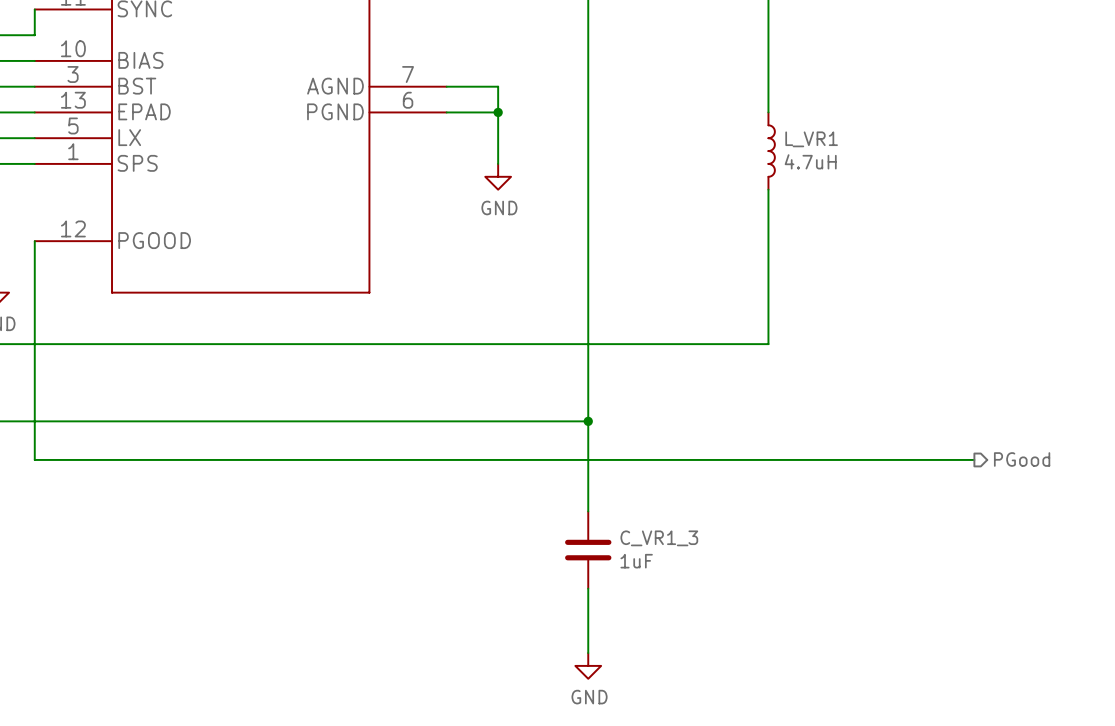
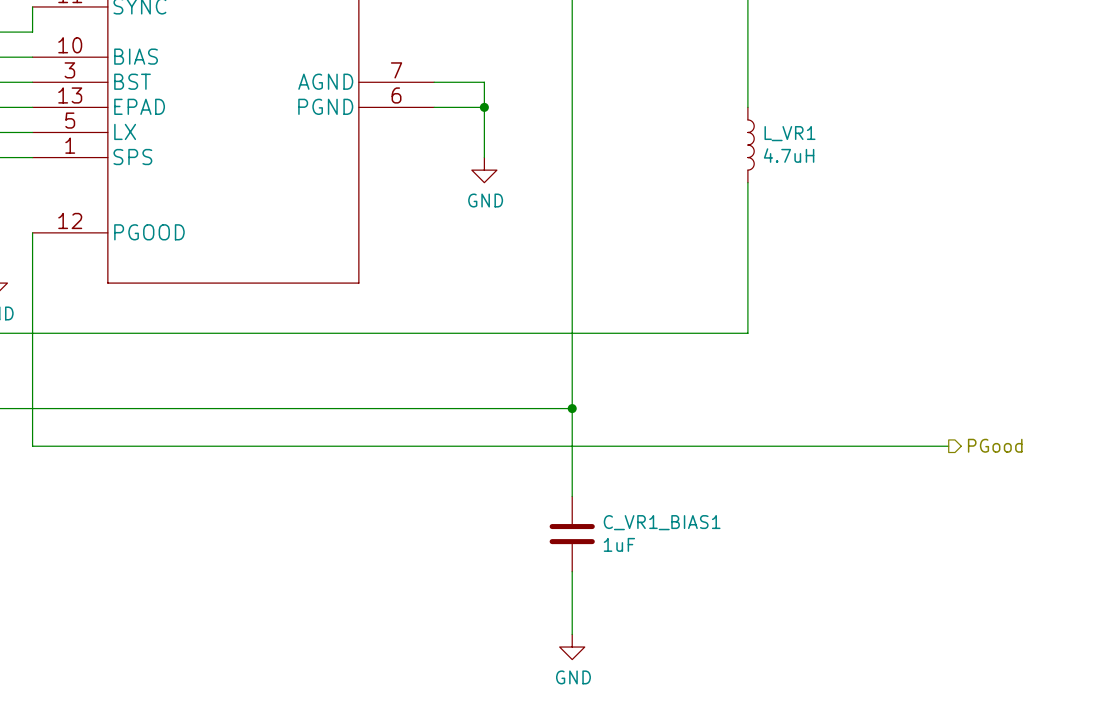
C_VR1_3 name: C_VR1_3 (659, 538) -> C_VR1_BIAS1 (662, 522)

